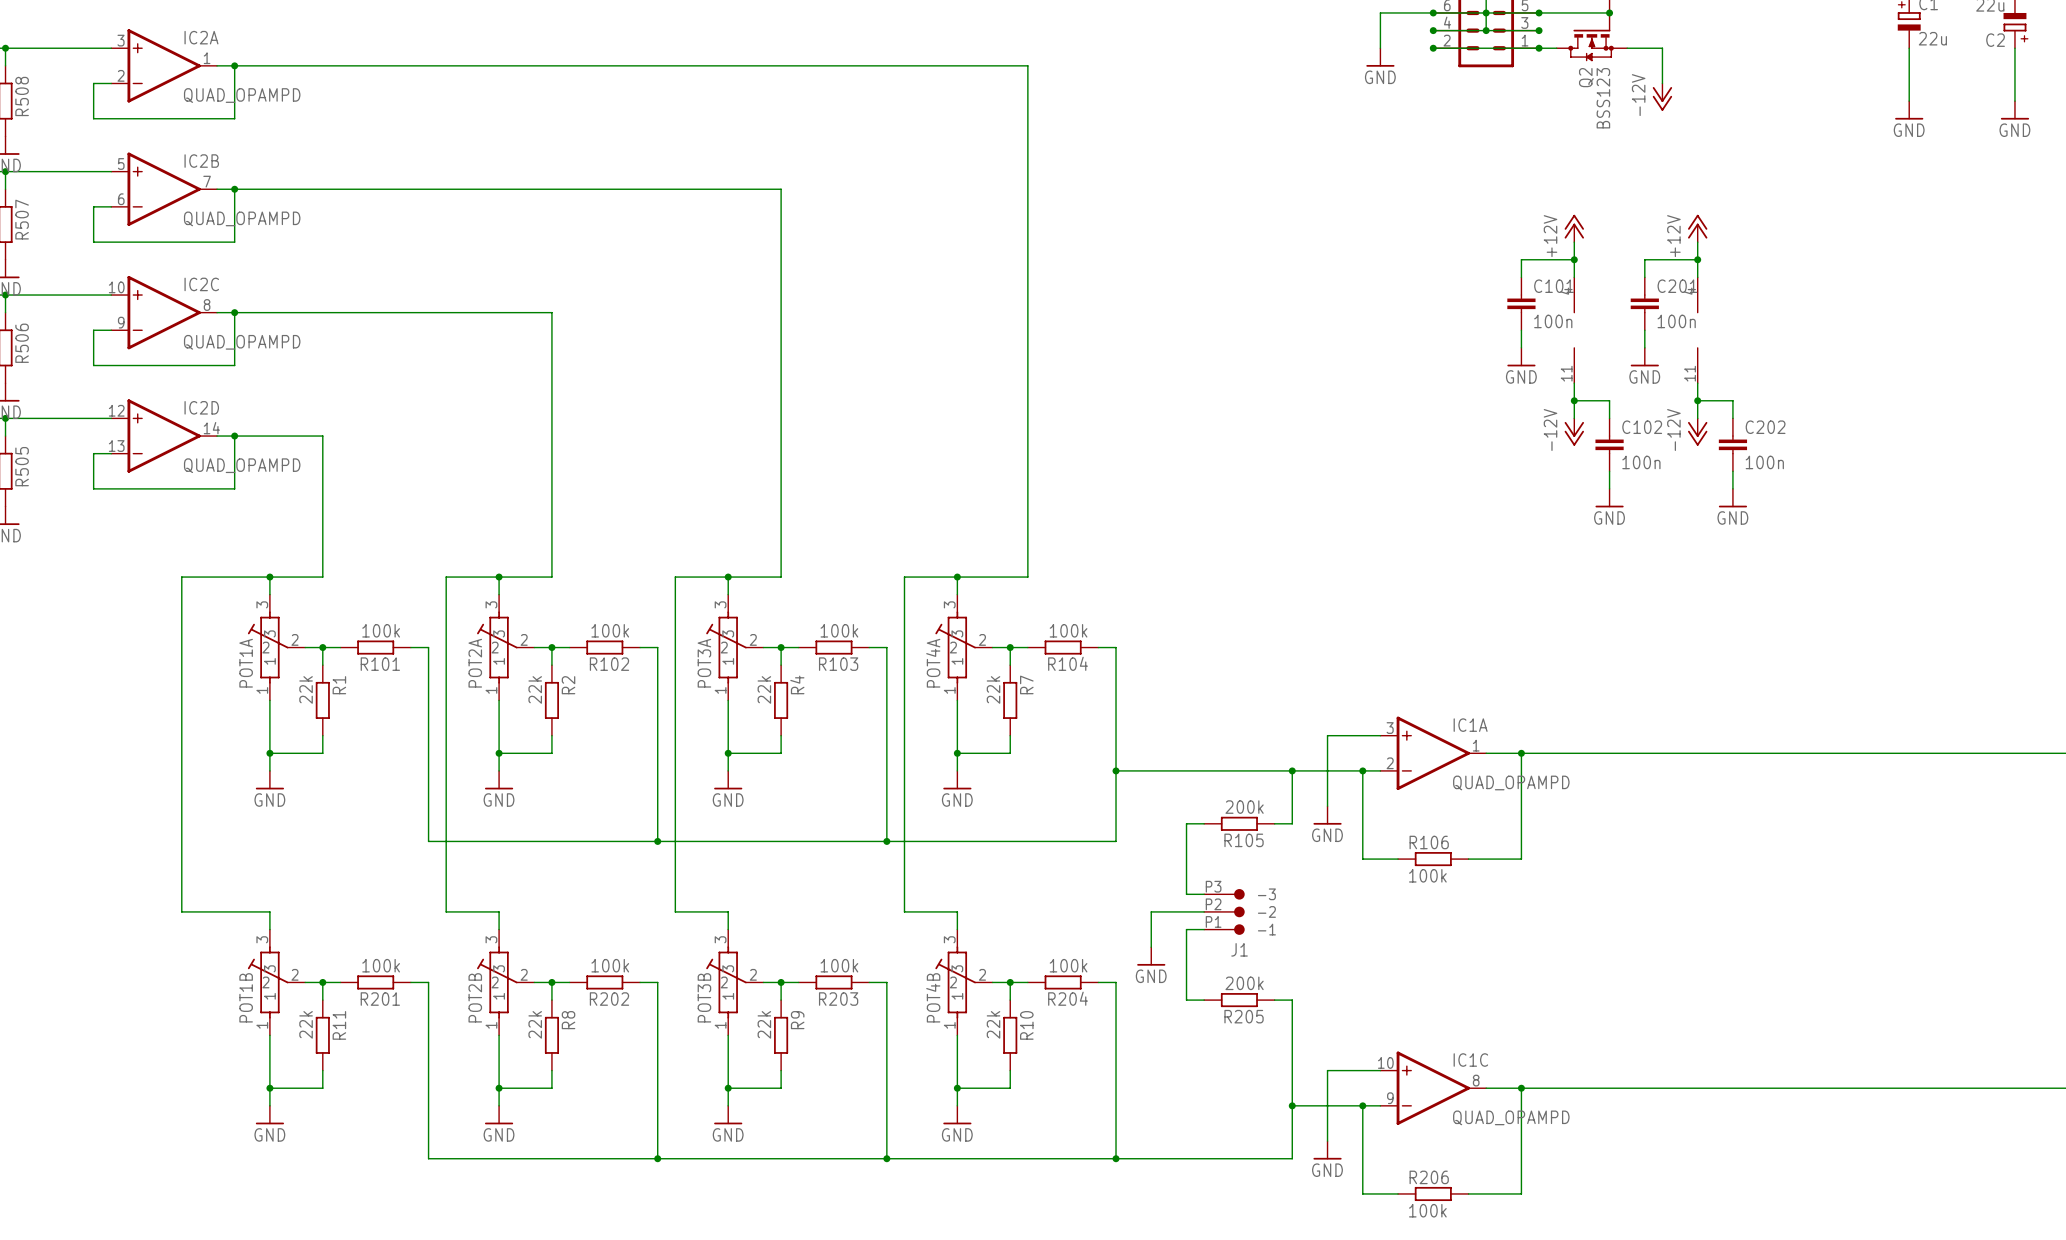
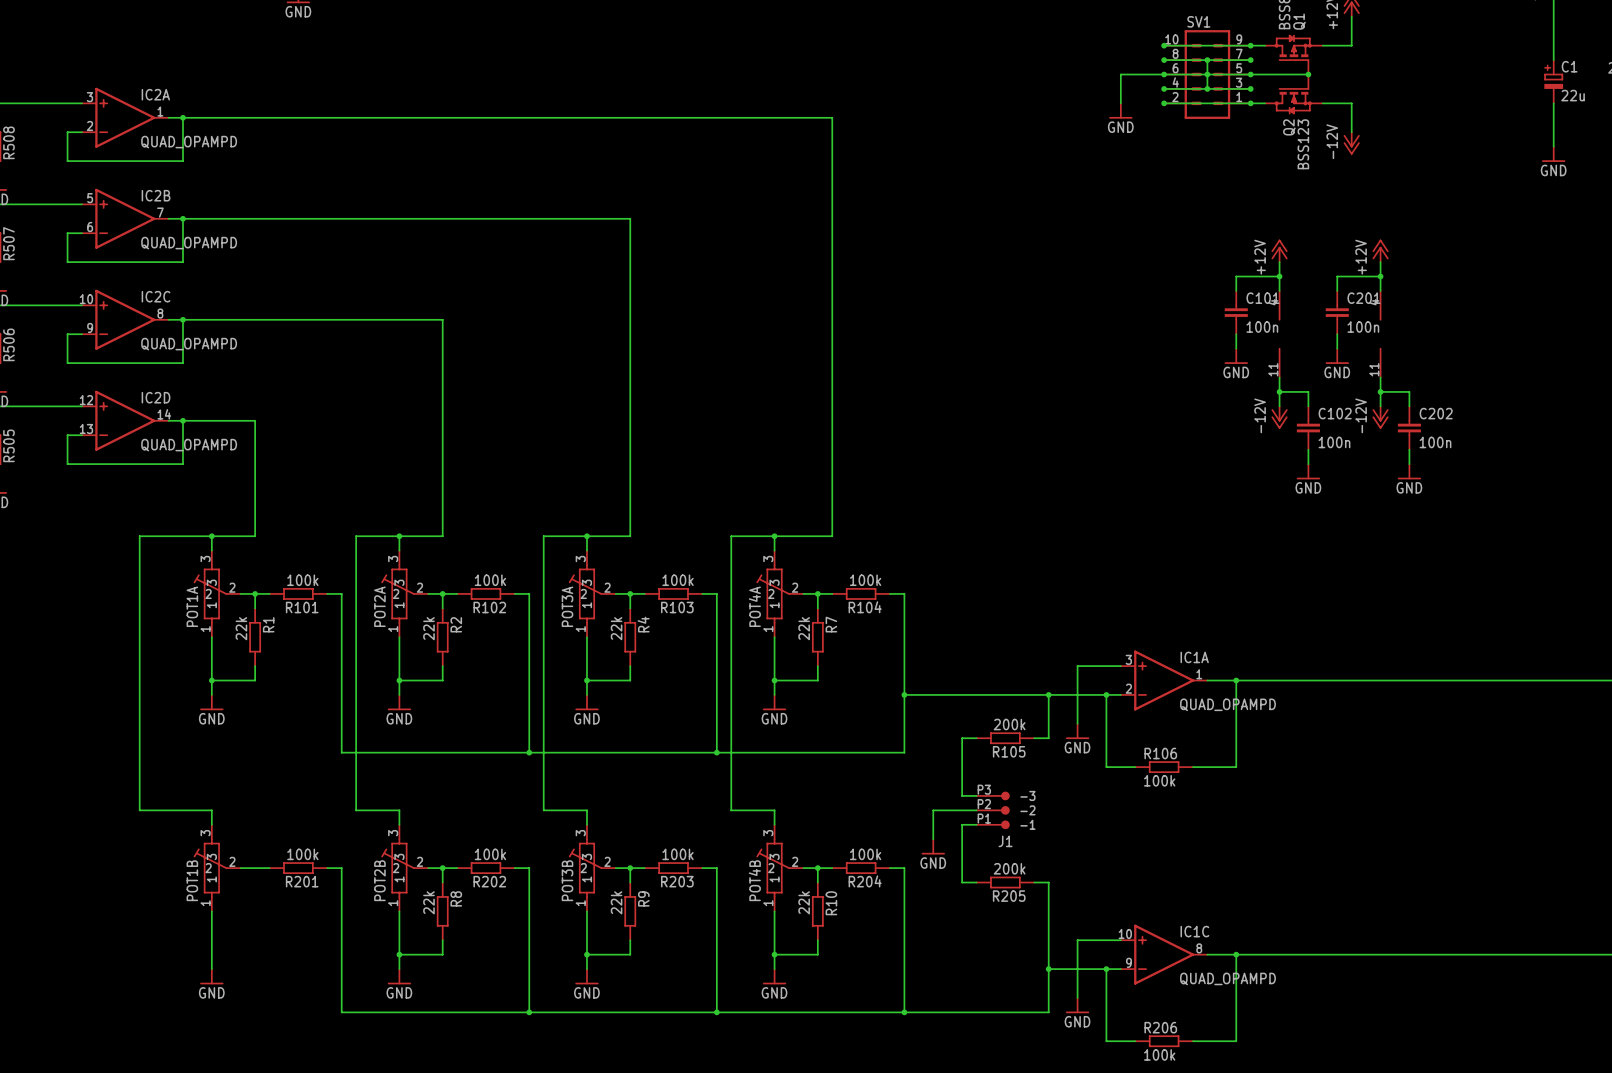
wire: (322, 982) (322, 1000) -> none
junction: (322, 982) -> none
R11: 22k (322, 1035) -> none
wire: (322, 1070) (322, 1088) (269, 1088) -> none
junction: (269, 1088) -> none

